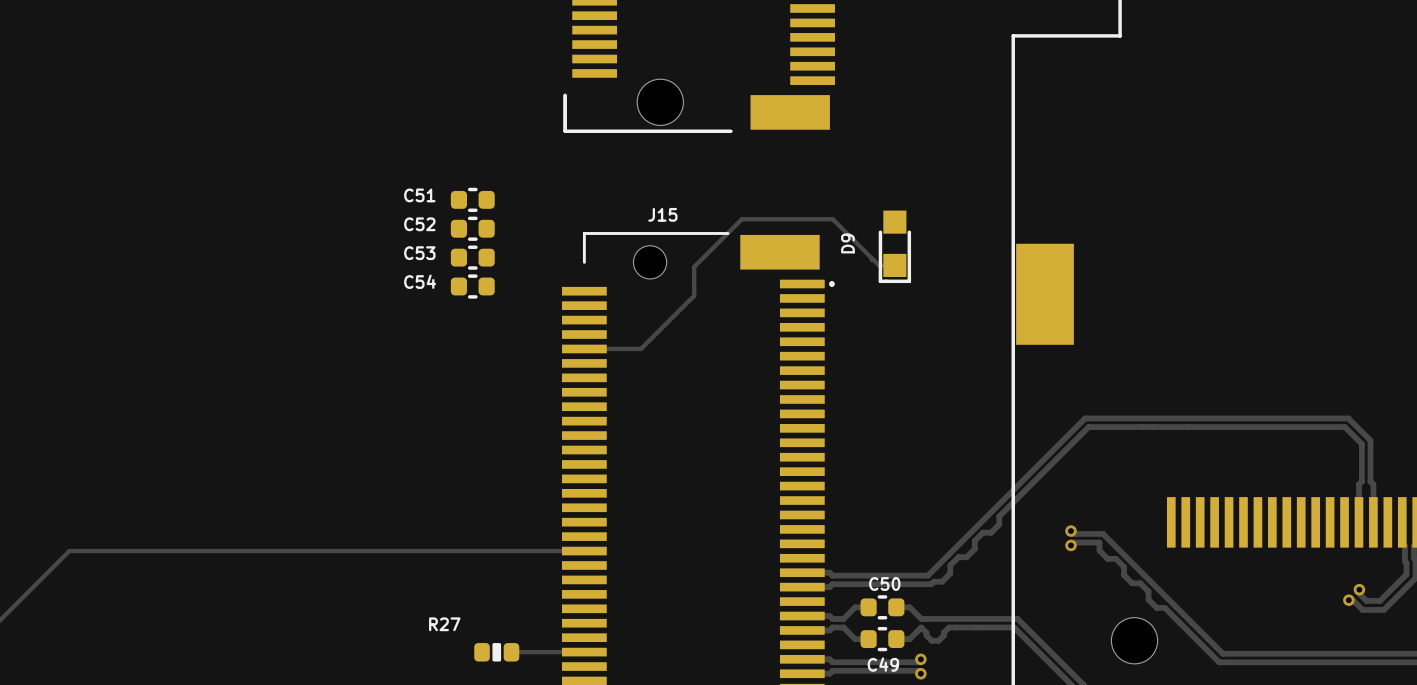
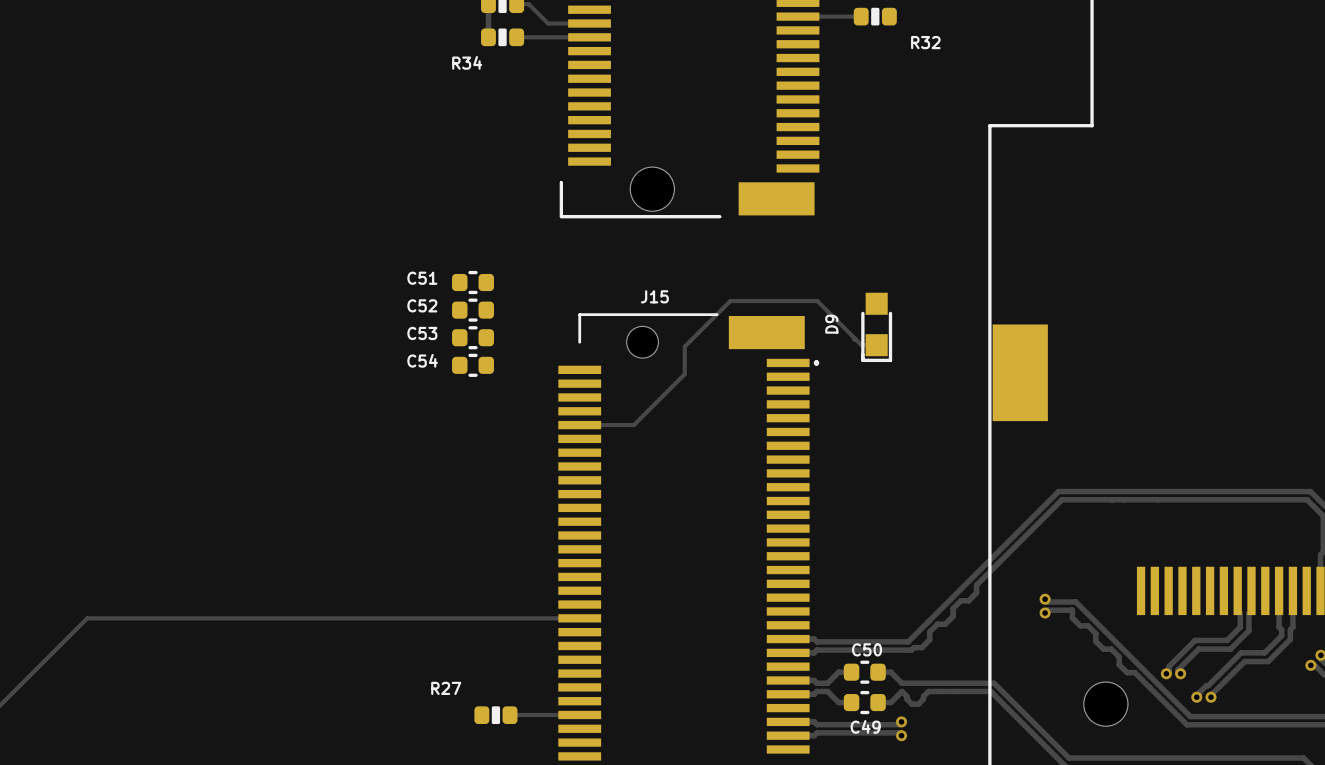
track: none -> (1237, 590) (1240, 627) (1227, 640) (1195, 640) (1169, 666) (1169, 670) (1166, 673)
track: none -> (1251, 590) (1248, 630) (1230, 649) (1198, 649) (1177, 670) (1180, 673)
track: none -> (1279, 590) (1279, 627) (1281, 629) (1281, 635) (1264, 652) (1241, 652) (1196, 697)
track: none -> (1292, 590) (1292, 627) (1290, 629) (1290, 639) (1268, 661) (1244, 661) (1211, 697)
via: none -> (1166, 673)
via: none -> (1180, 673)
via: none -> (1196, 697)
via: none -> (1211, 697)

